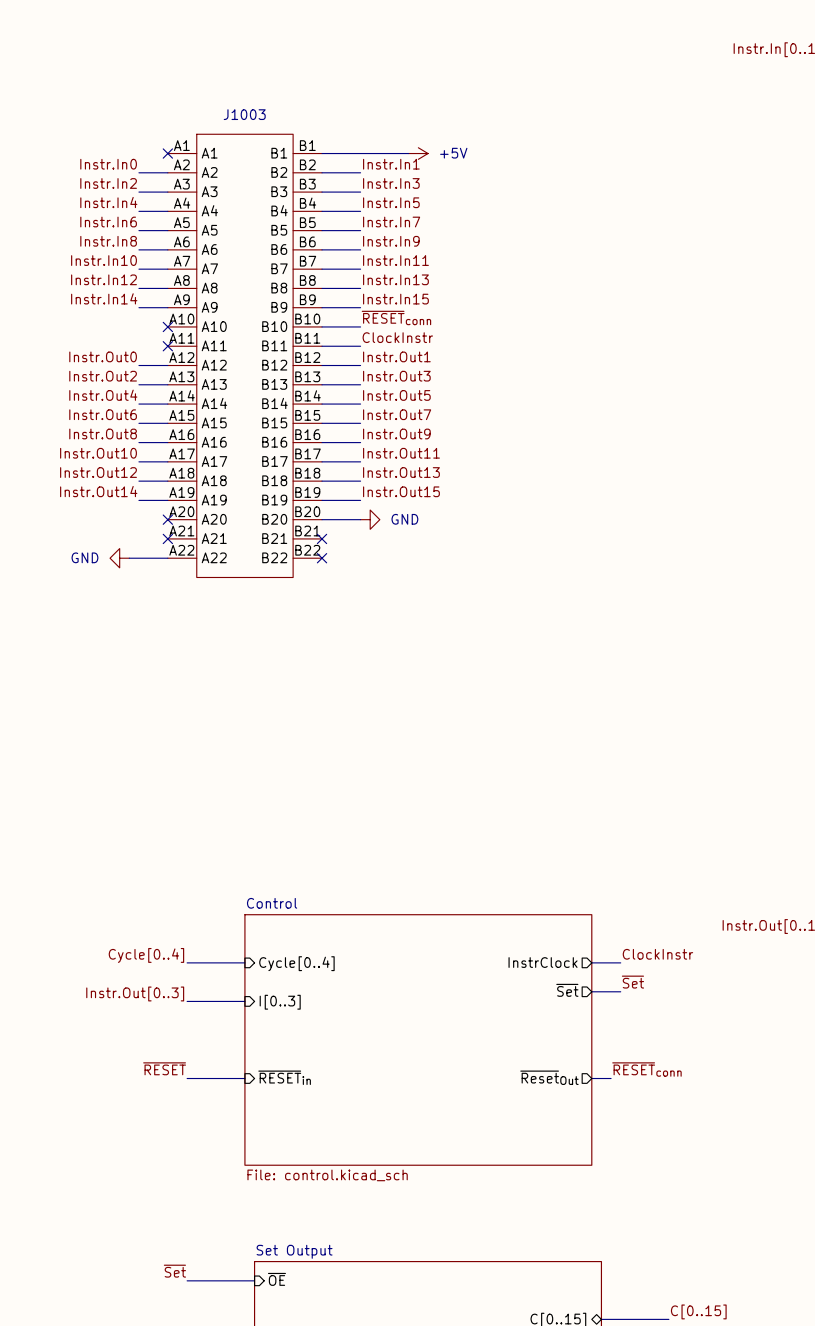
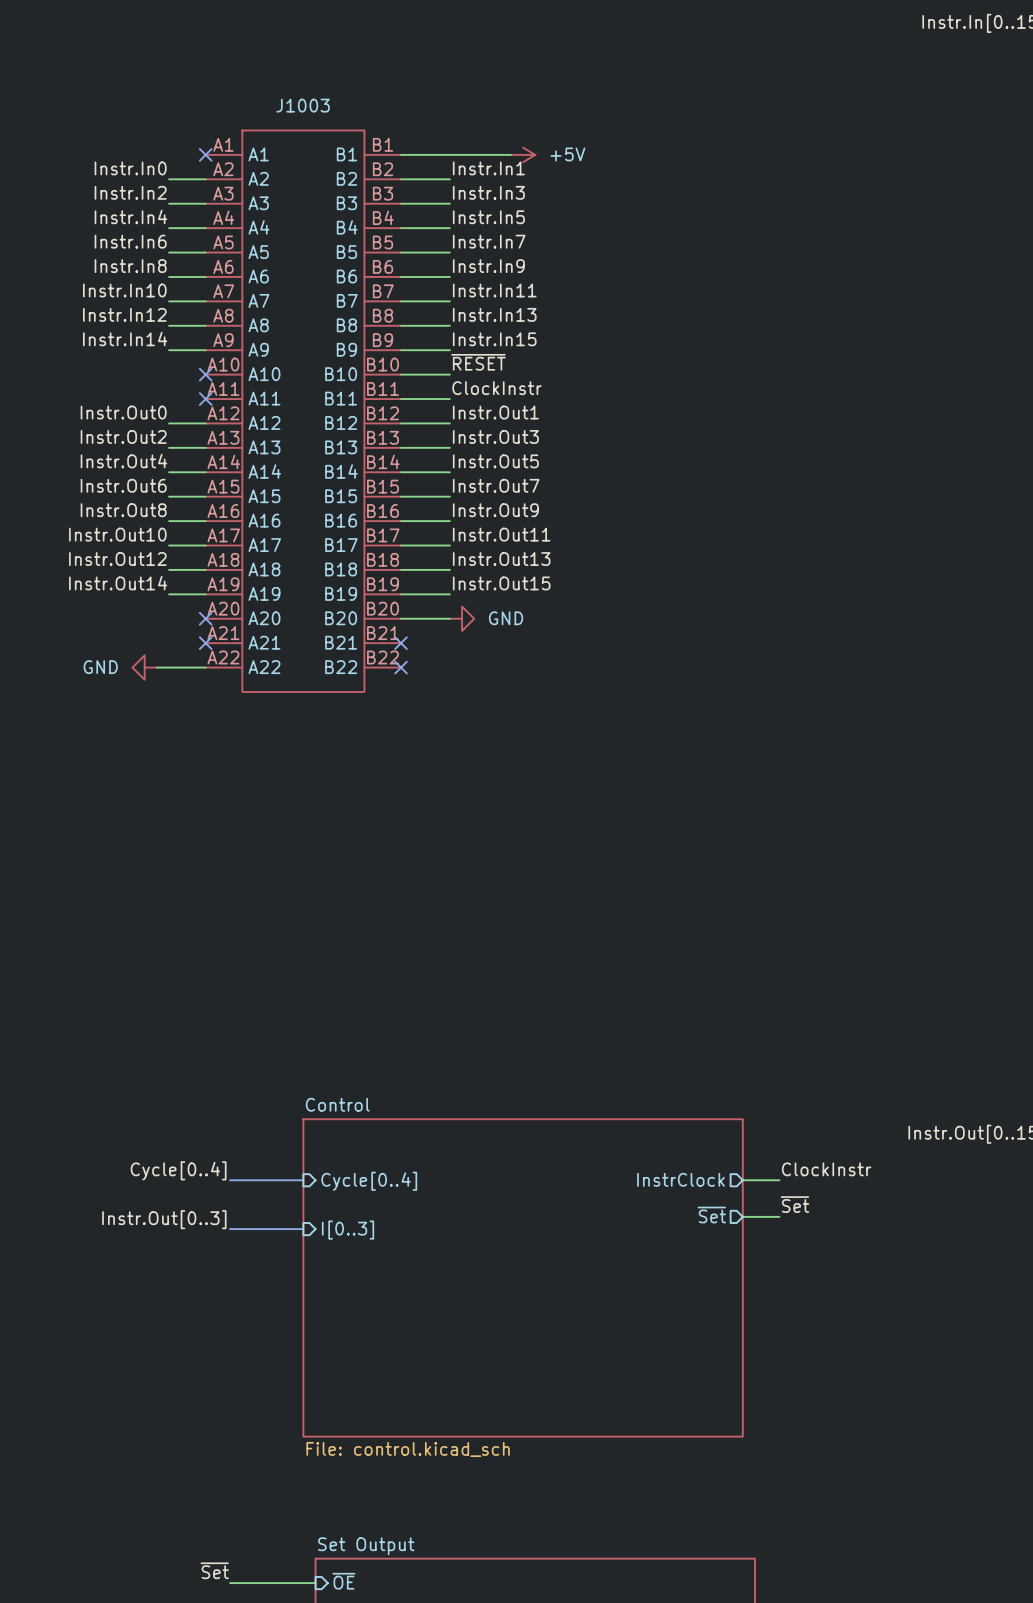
label: ~{RESET}conn (396, 317) -> ~{RESET} (478, 362)
label: ~{RESET} (164, 1068) -> none
label: ~{RESET}conn (646, 1069) -> none
sheet pin: ~{RESET}in (284, 1077) -> none
sheet pin: ~{Reset}Out (549, 1077) -> none
wire: (187, 1078) (244, 1078) -> none
wire: (591, 1078) (611, 1078) -> none

